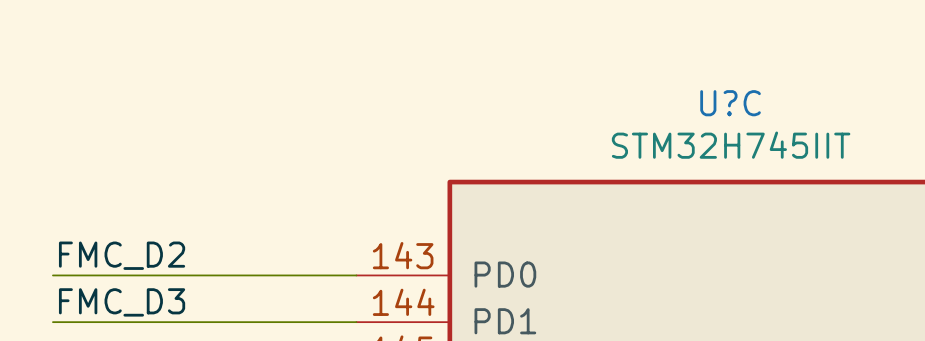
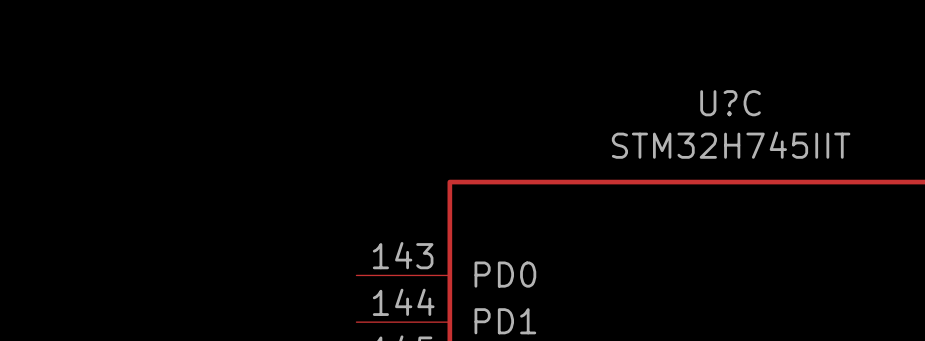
label: FMC_D2 (122, 255) -> none
wire: (52, 275) (356, 275) -> none
label: FMC_D3 (122, 302) -> none
wire: (52, 322) (356, 322) -> none

